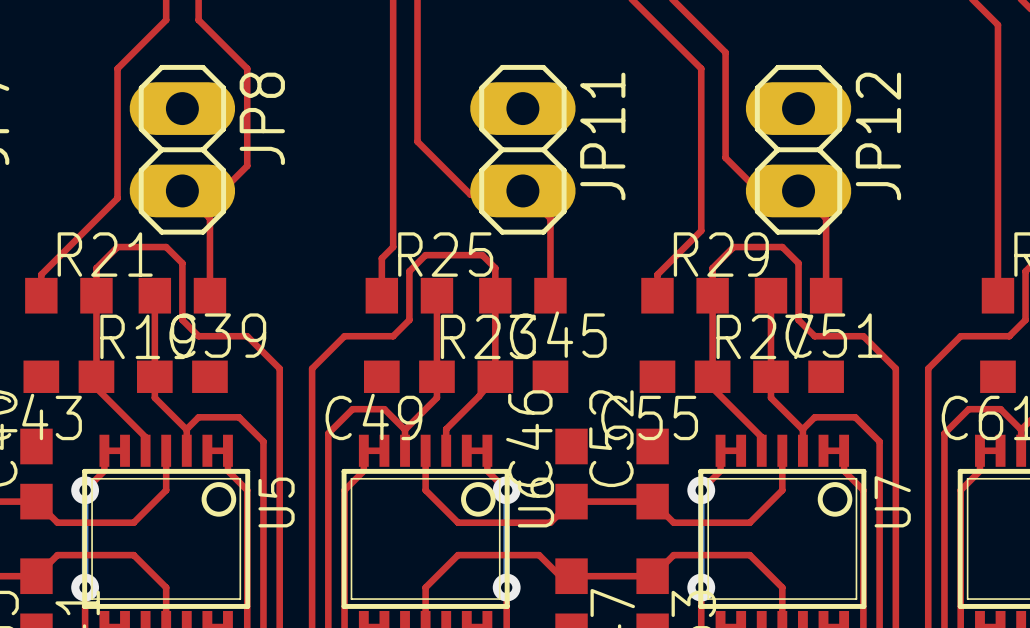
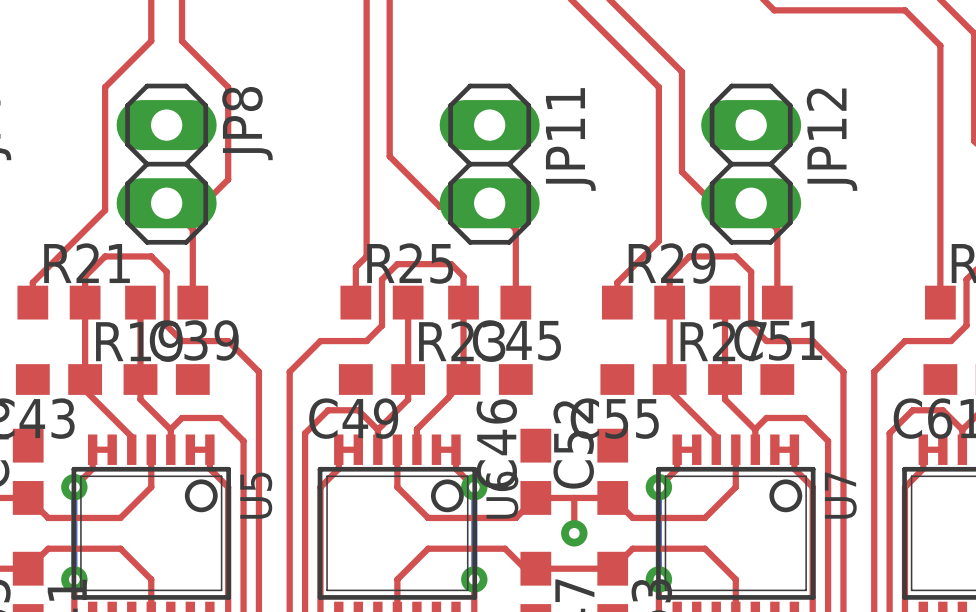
top track: none -> (574, 497) (574, 533)
via: none -> (574, 533)

